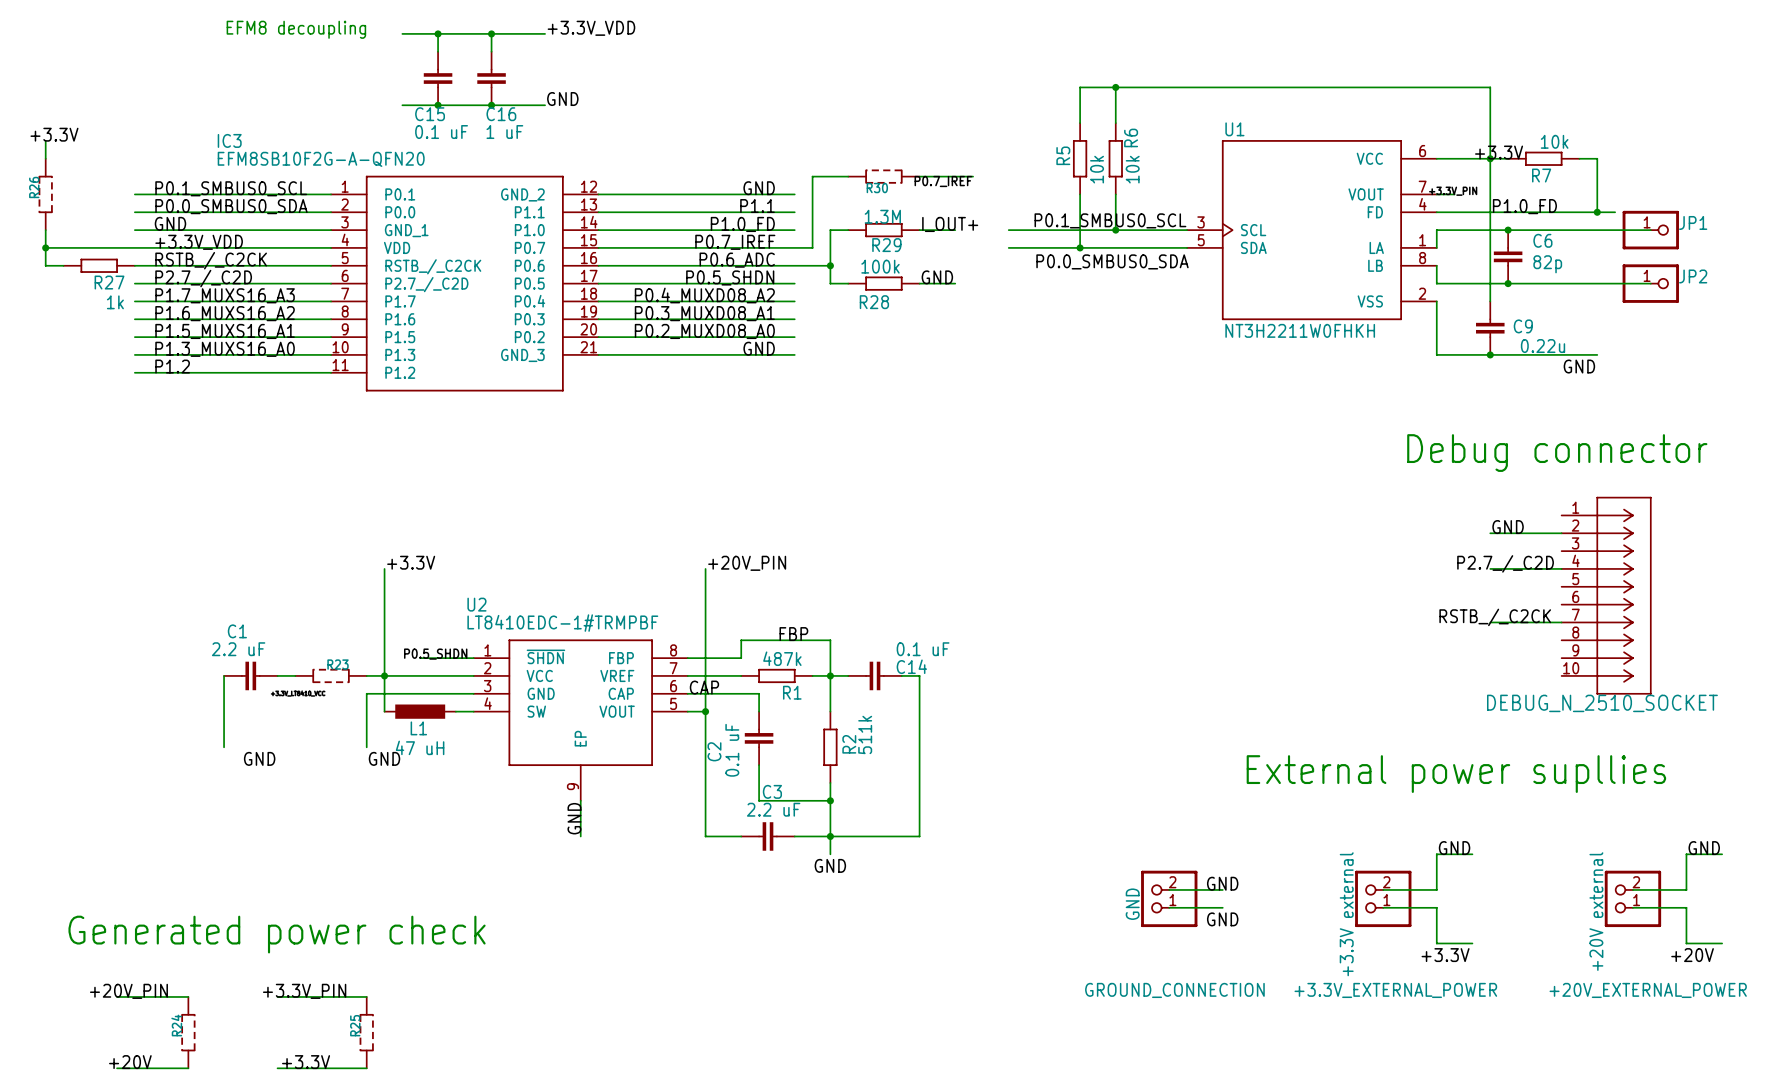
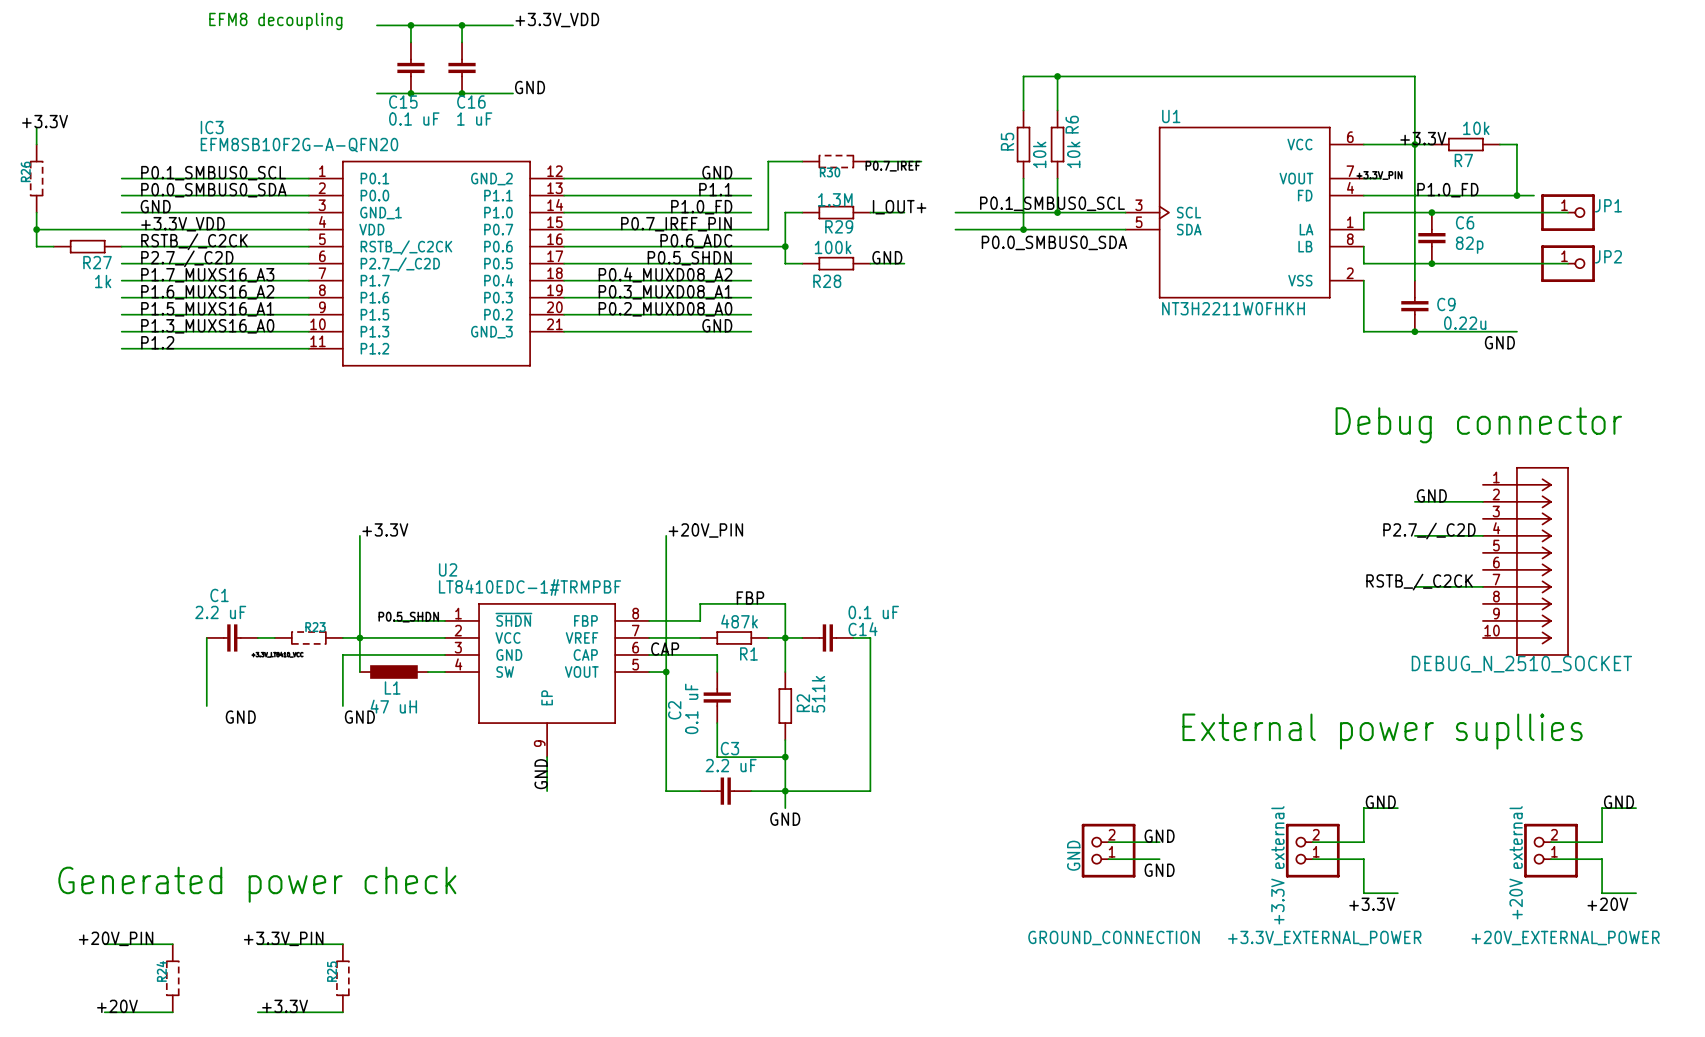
label: P0.7_IREF (735, 242) -> P0.7_IREF_PIN (676, 224)

